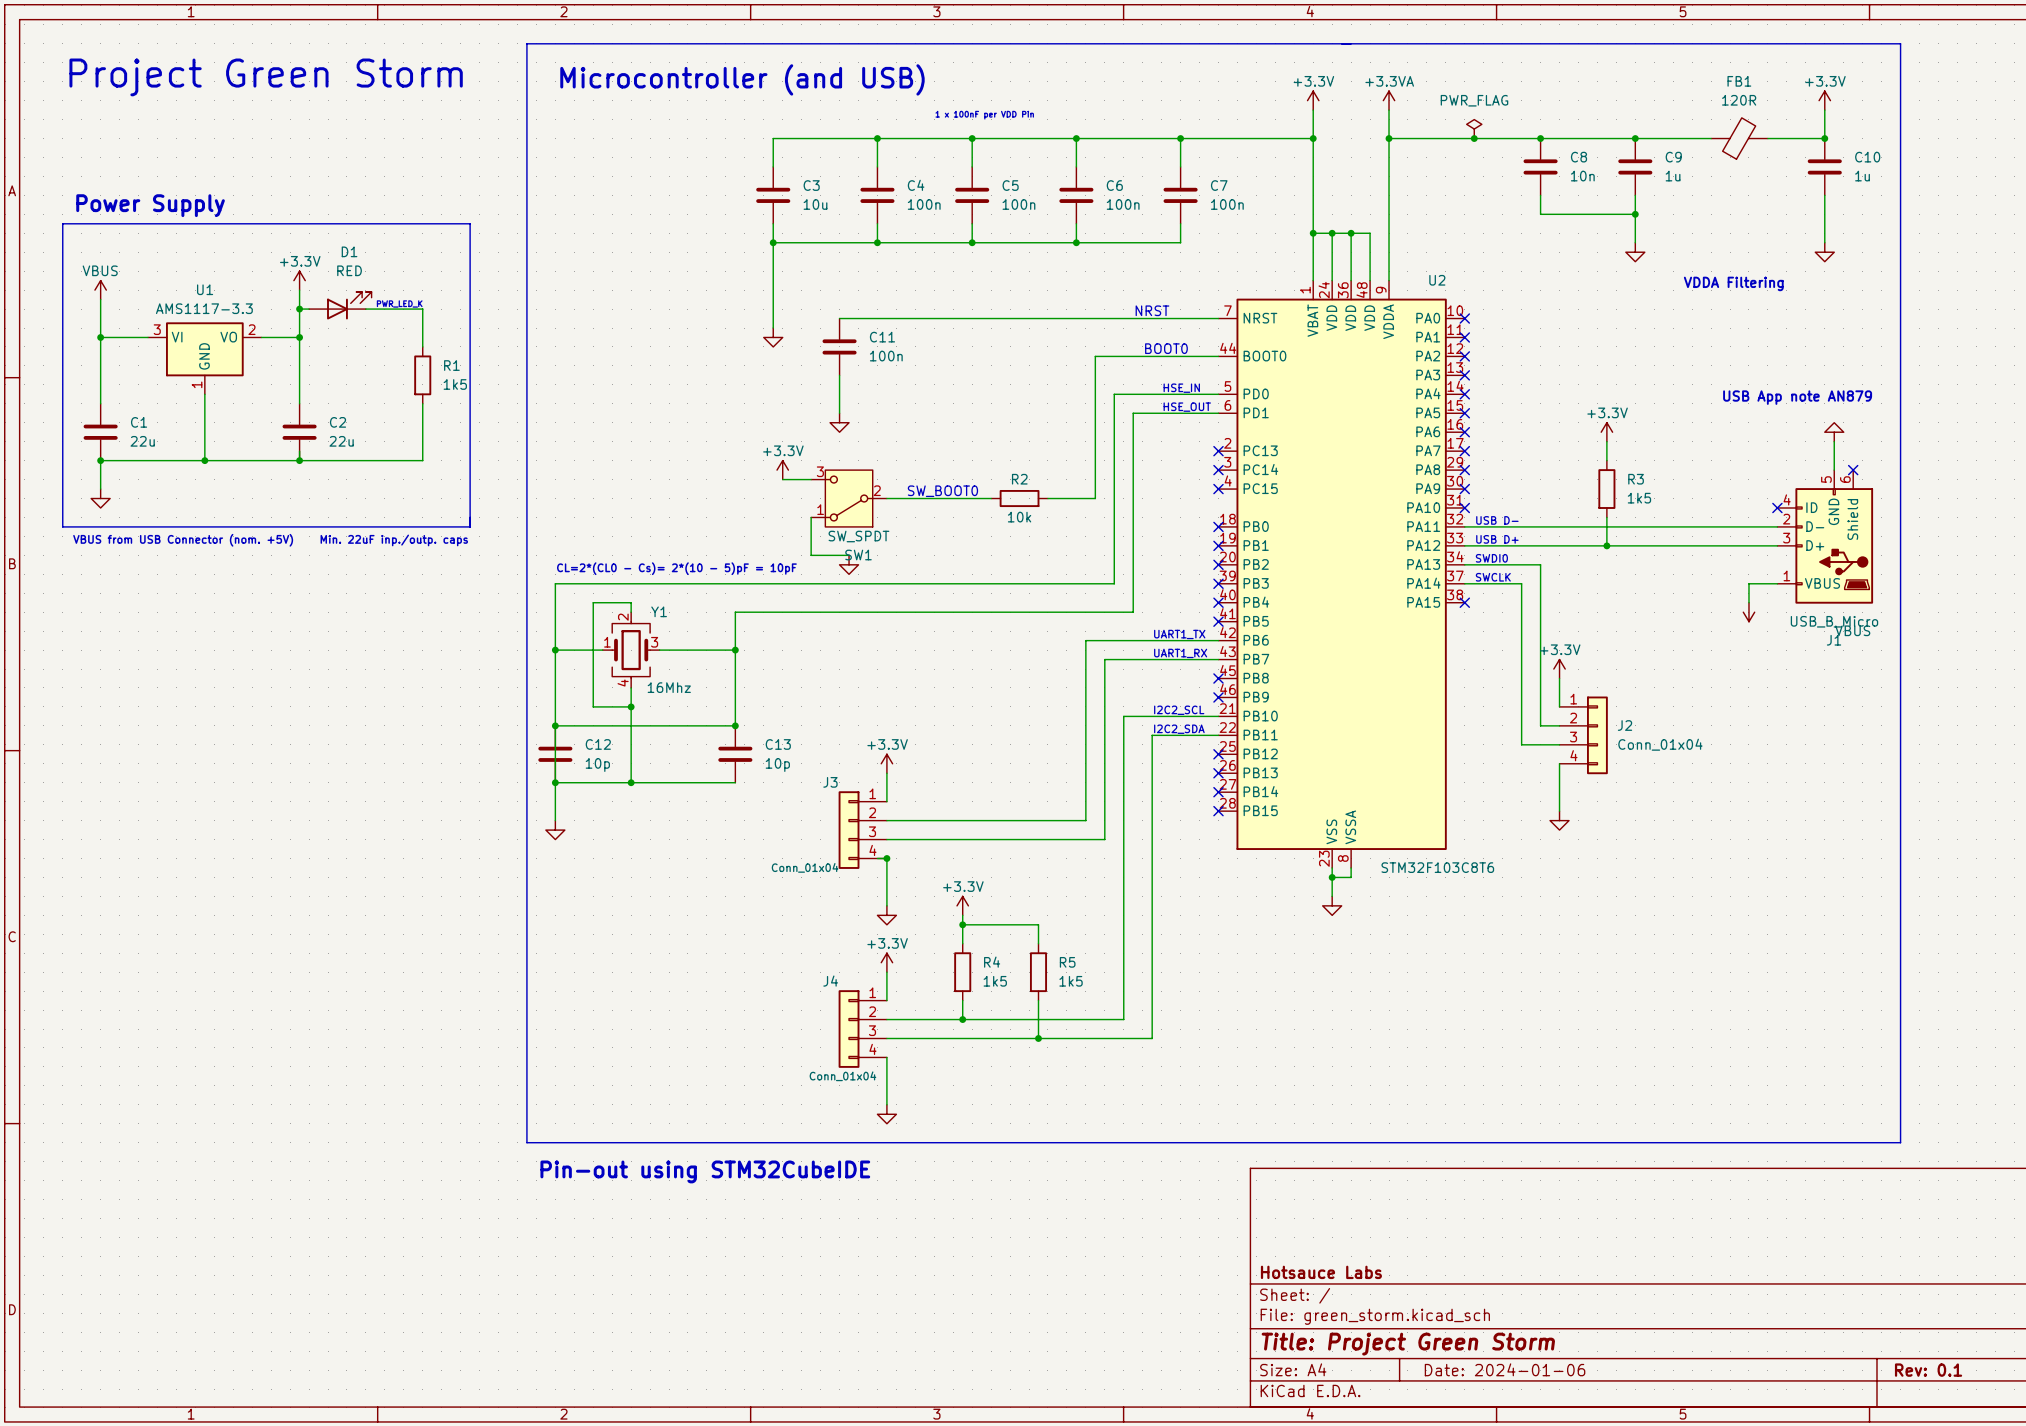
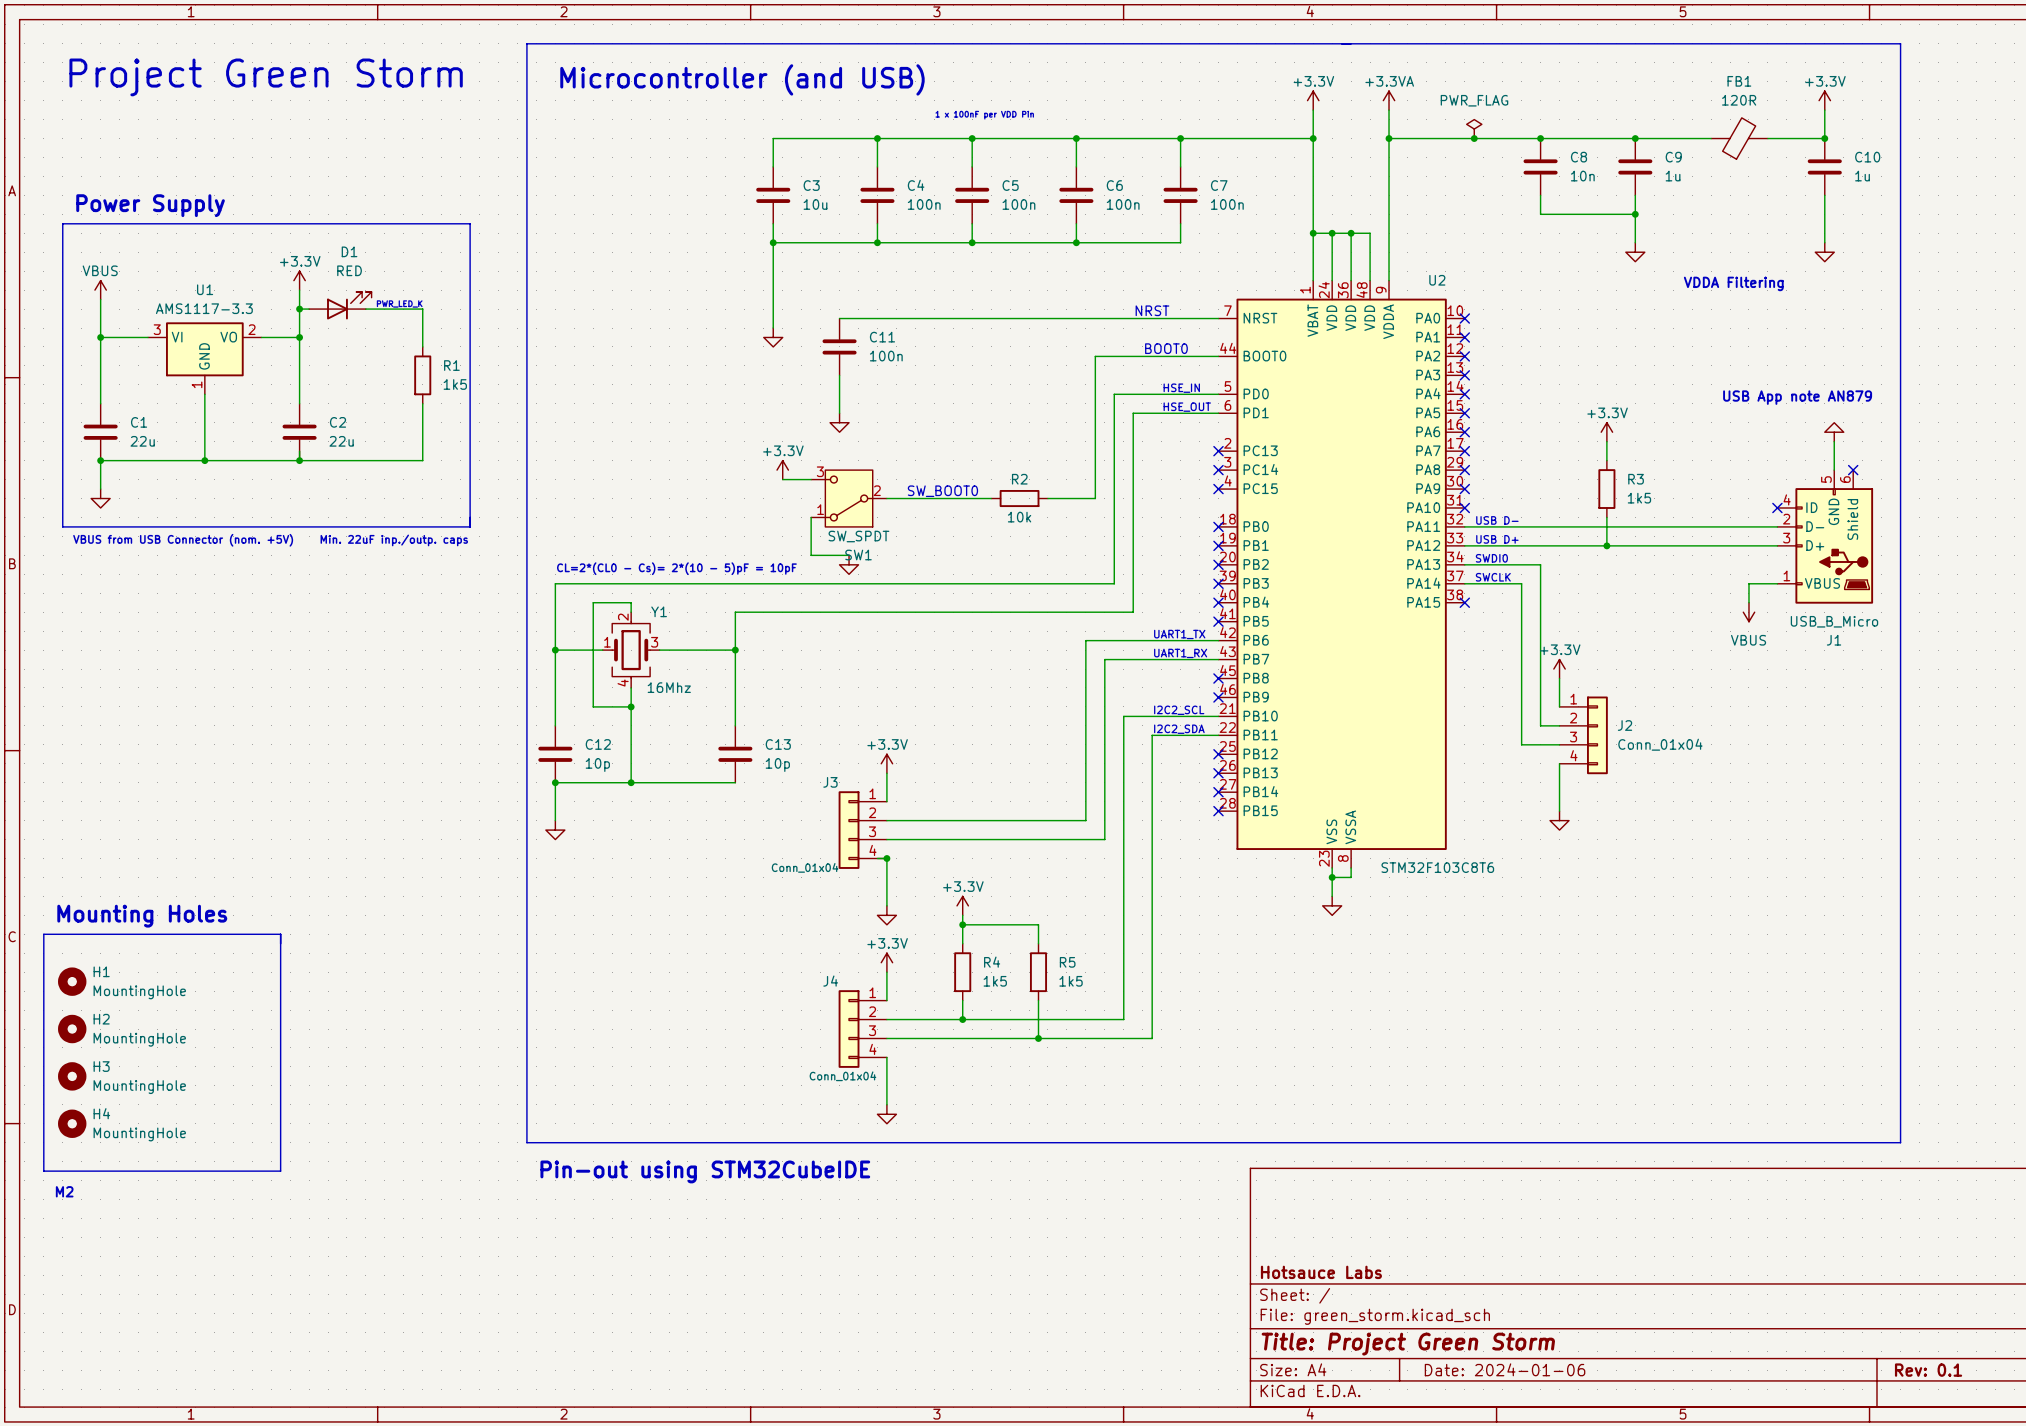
power symbol text position: VBUS (1852, 630) -> VBUS (1748, 640)
junction: (555, 725) -> none
wire: (735, 725) (555, 725) (555, 782) -> none
junction: (735, 725) -> none
text: none -> Mounting Holes (142, 916)
line: none -> (43, 934) (280, 934) (280, 1171) (43, 1171) (43, 934)
H1: none -> MountingHole (72, 981)
H2: none -> MountingHole (72, 1029)
H3: none -> MountingHole (72, 1076)
H4: none -> MountingHole (72, 1123)
text: none -> M2 (64, 1191)

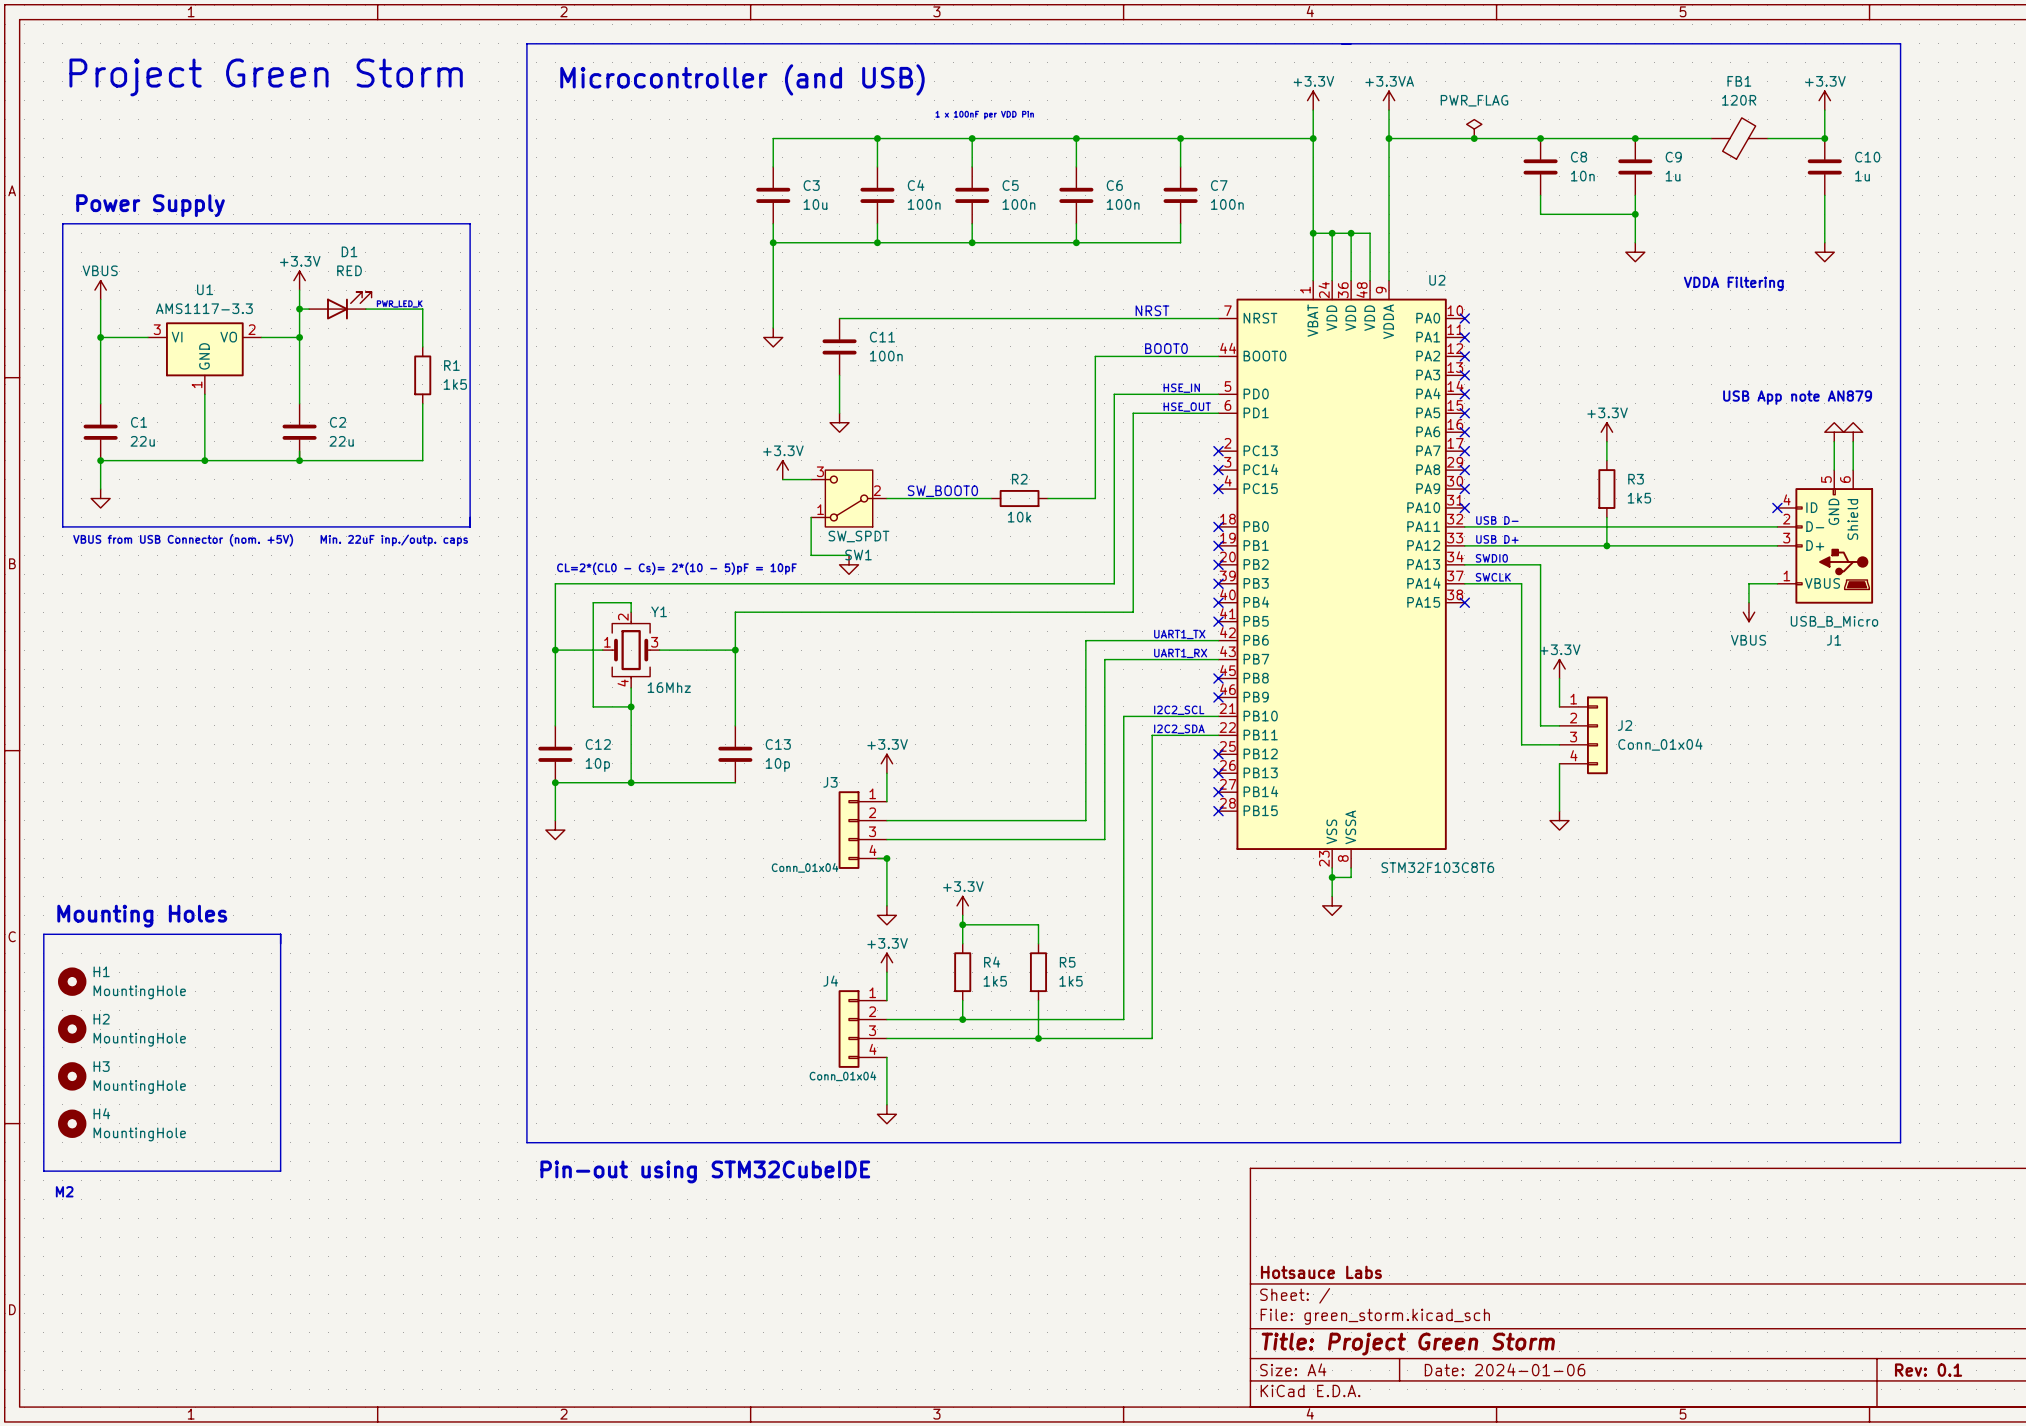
power symbol: none -> (1853, 432)
wire: none -> (1853, 441) (1853, 470)
no-connect mark: (1853, 470) -> none

